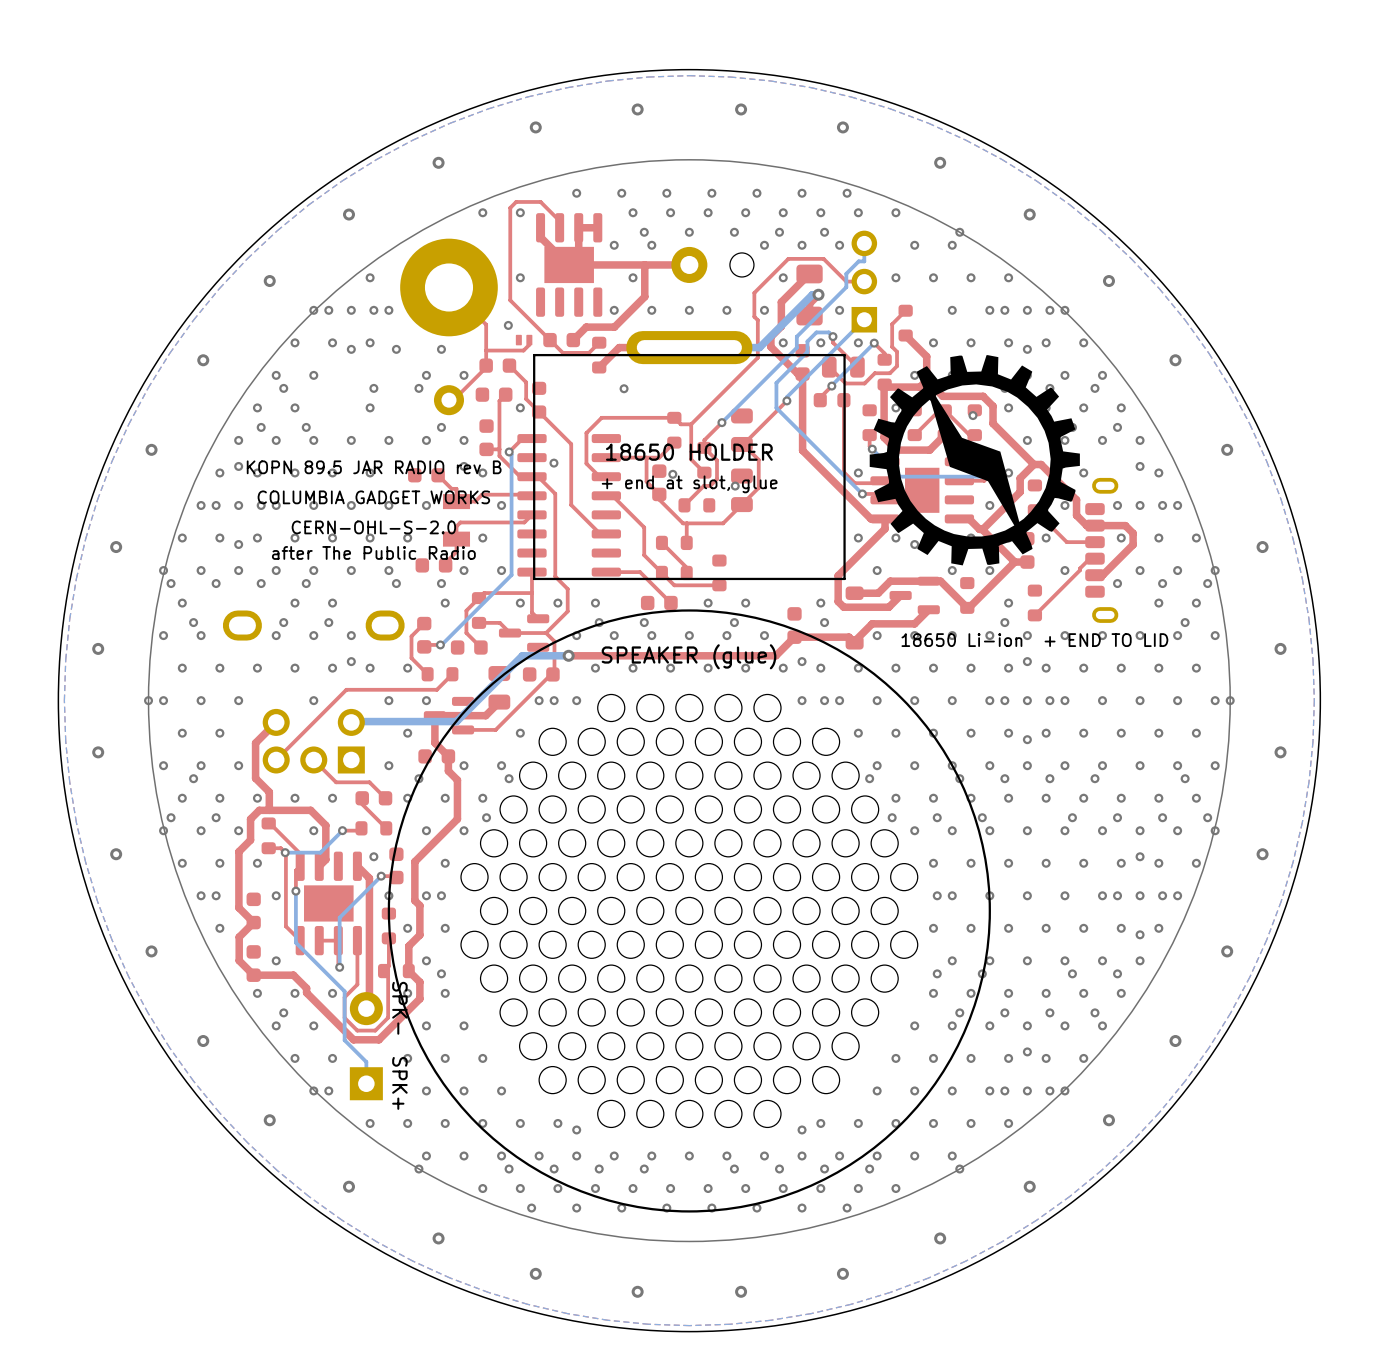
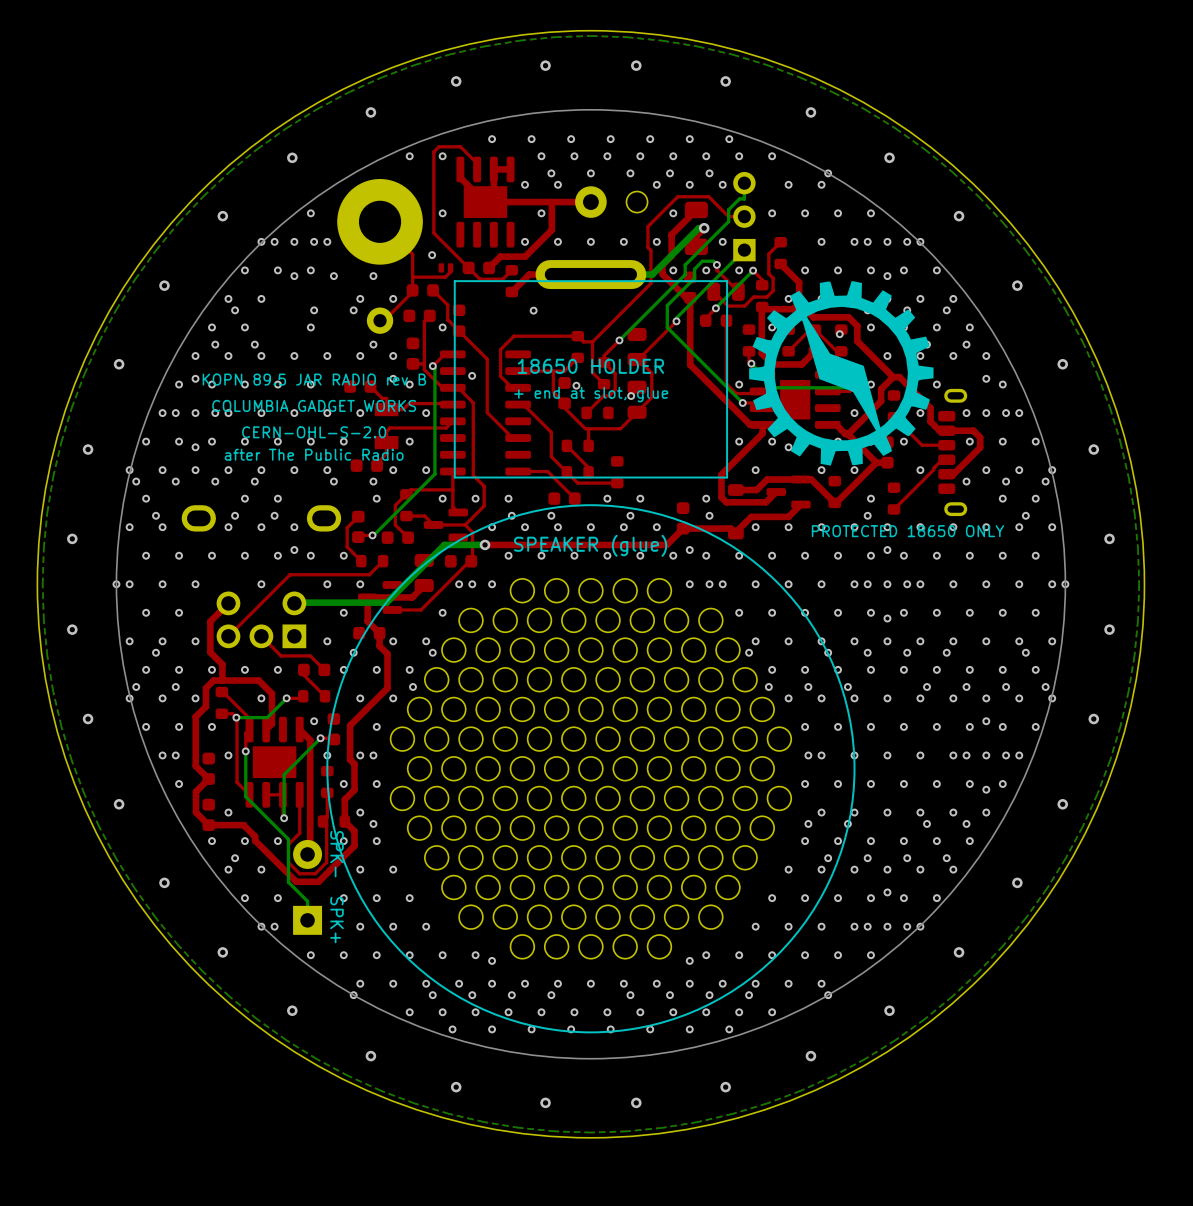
text: 18650 Li-ion + END TO LID (1034, 640) -> PROTECTED 18650 ONLY (907, 531)

